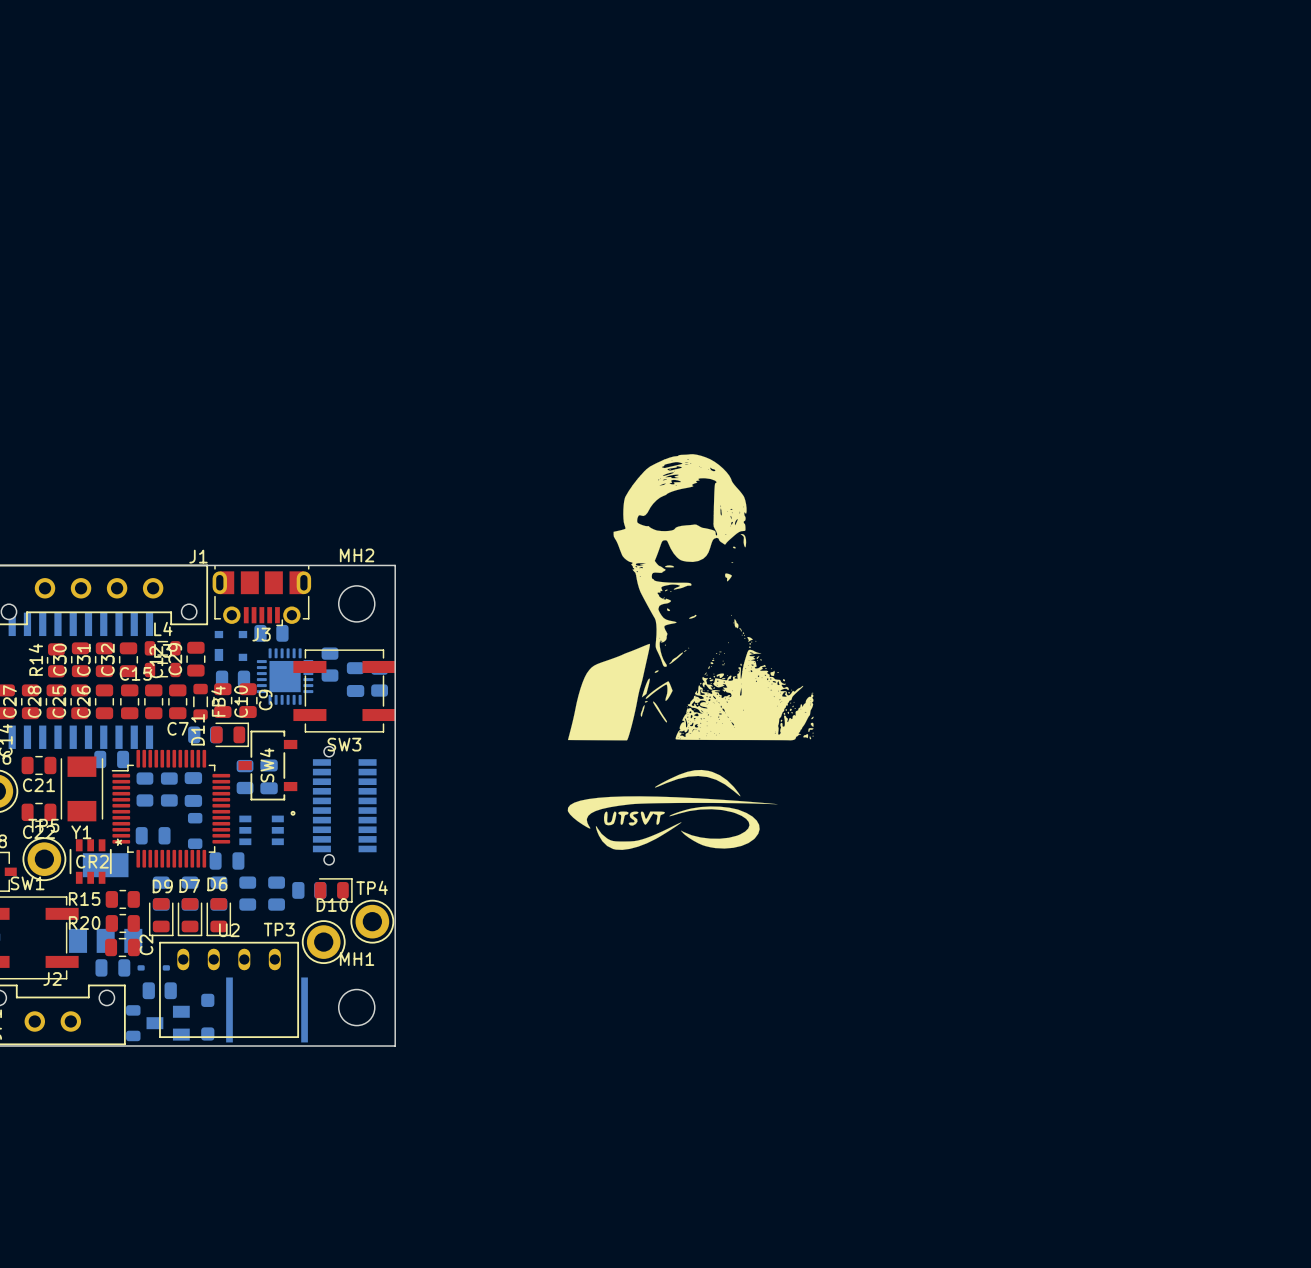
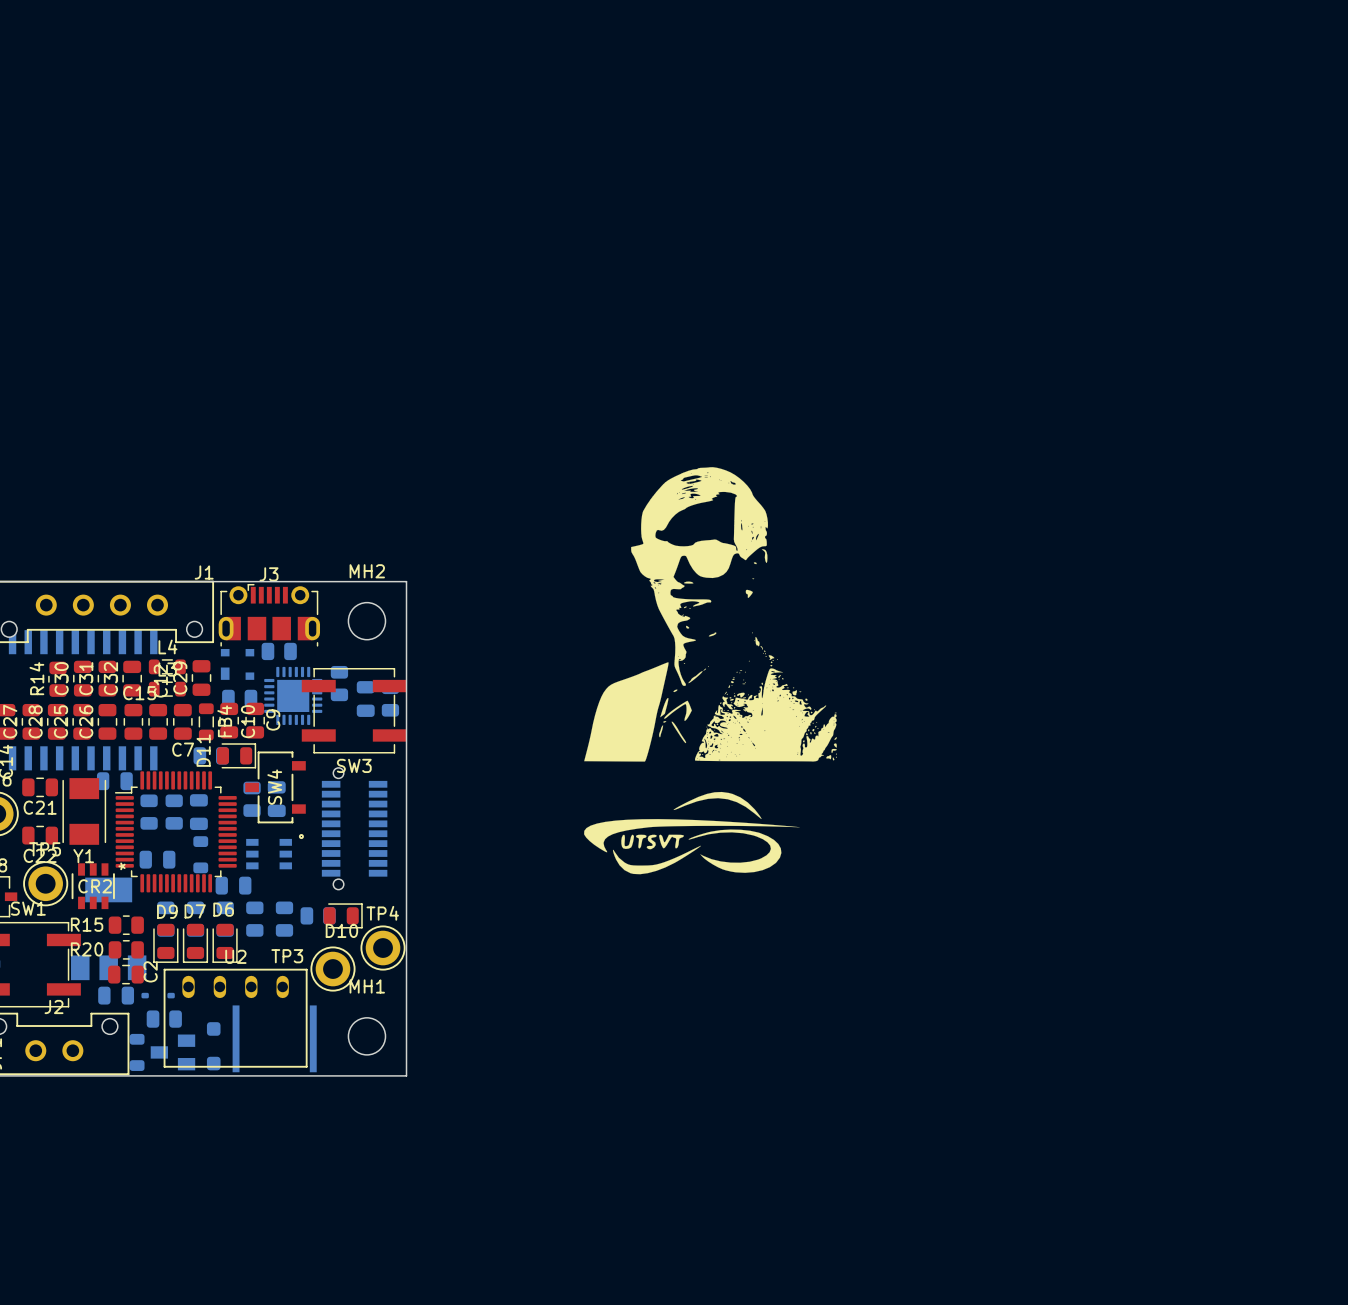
J3 rotation: 0° (261, 595) -> 180° (269, 615)

